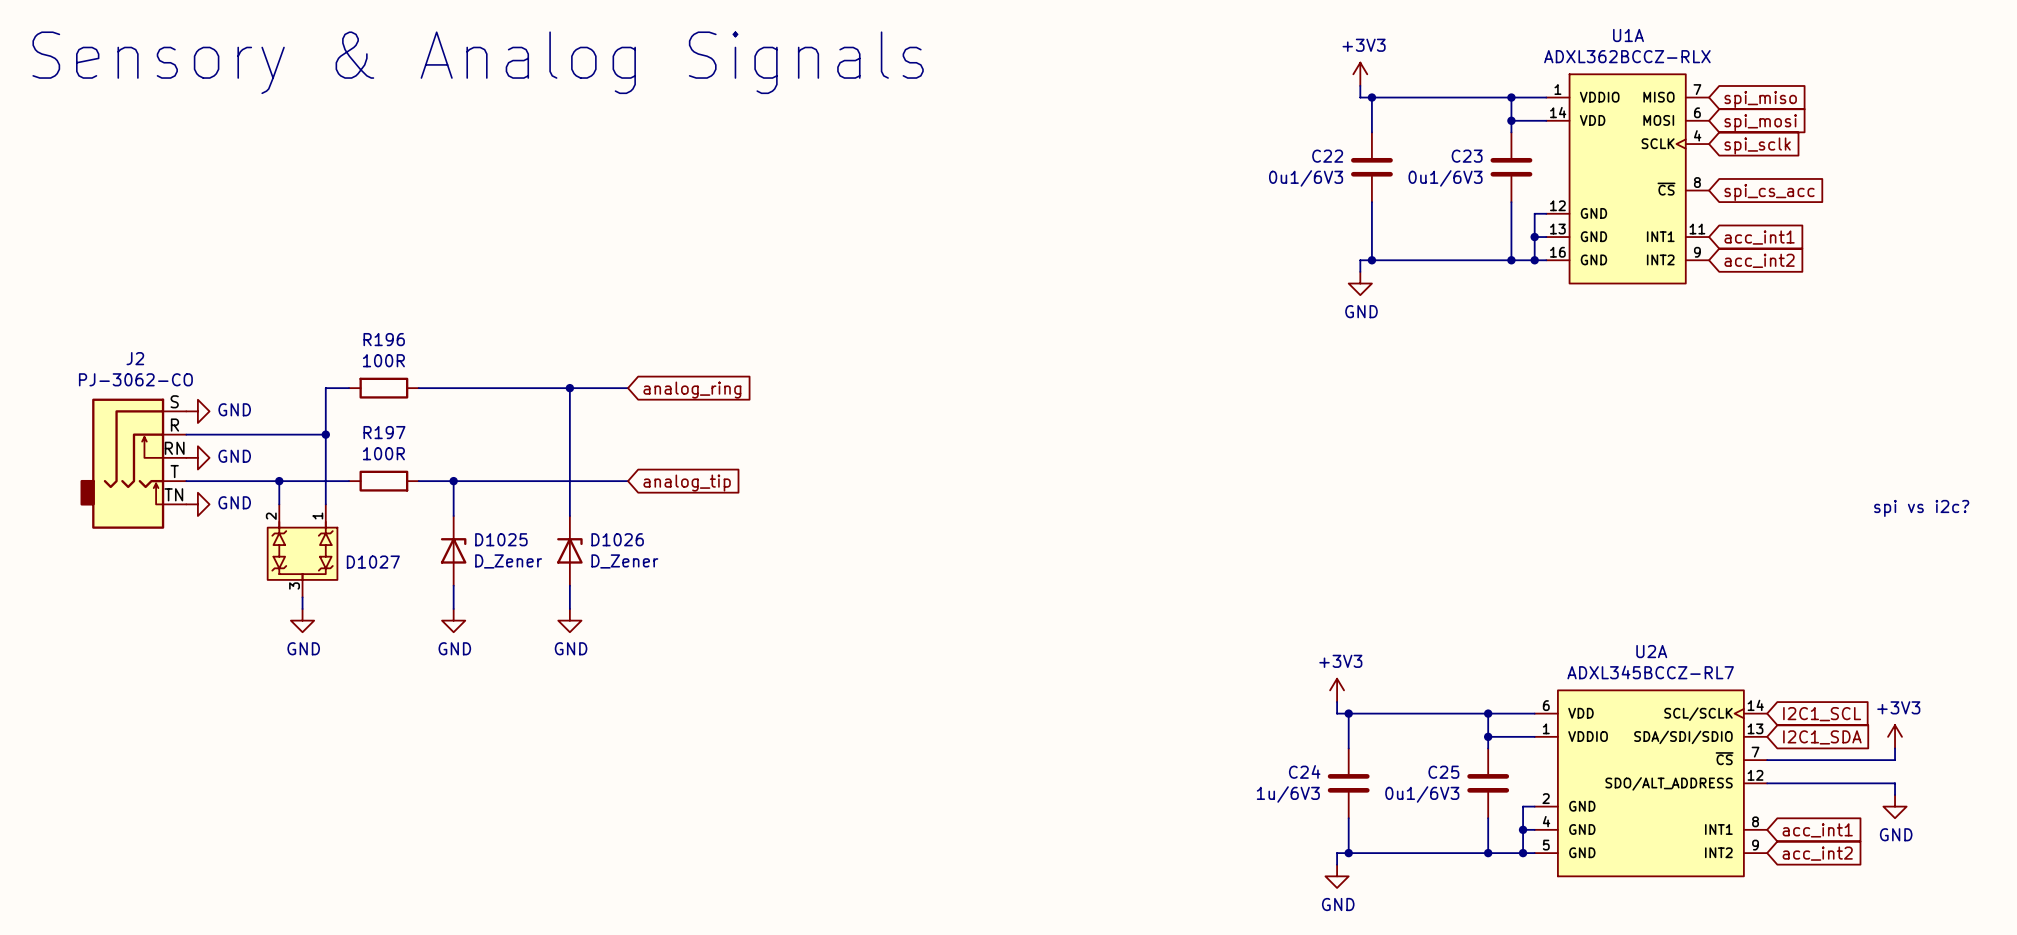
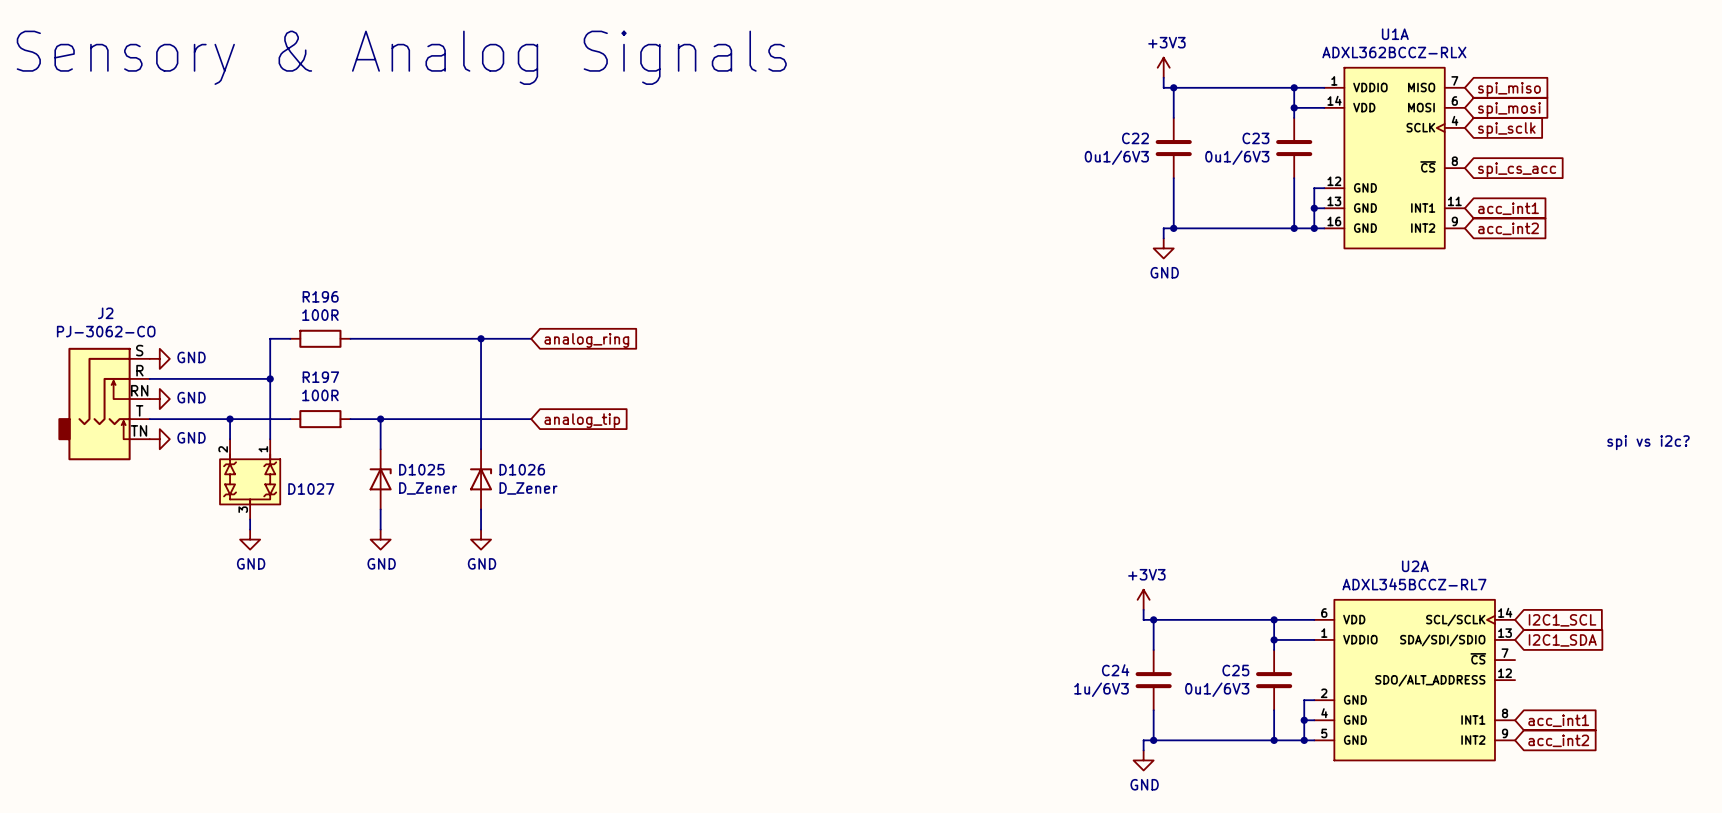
power symbol: +3V3 (1895, 736) -> none
wire: (1895, 748) (1895, 760) (1767, 760) -> none
wire: (1767, 783) (1895, 783) (1895, 794) -> none
power symbol: GND (1895, 806) -> none

